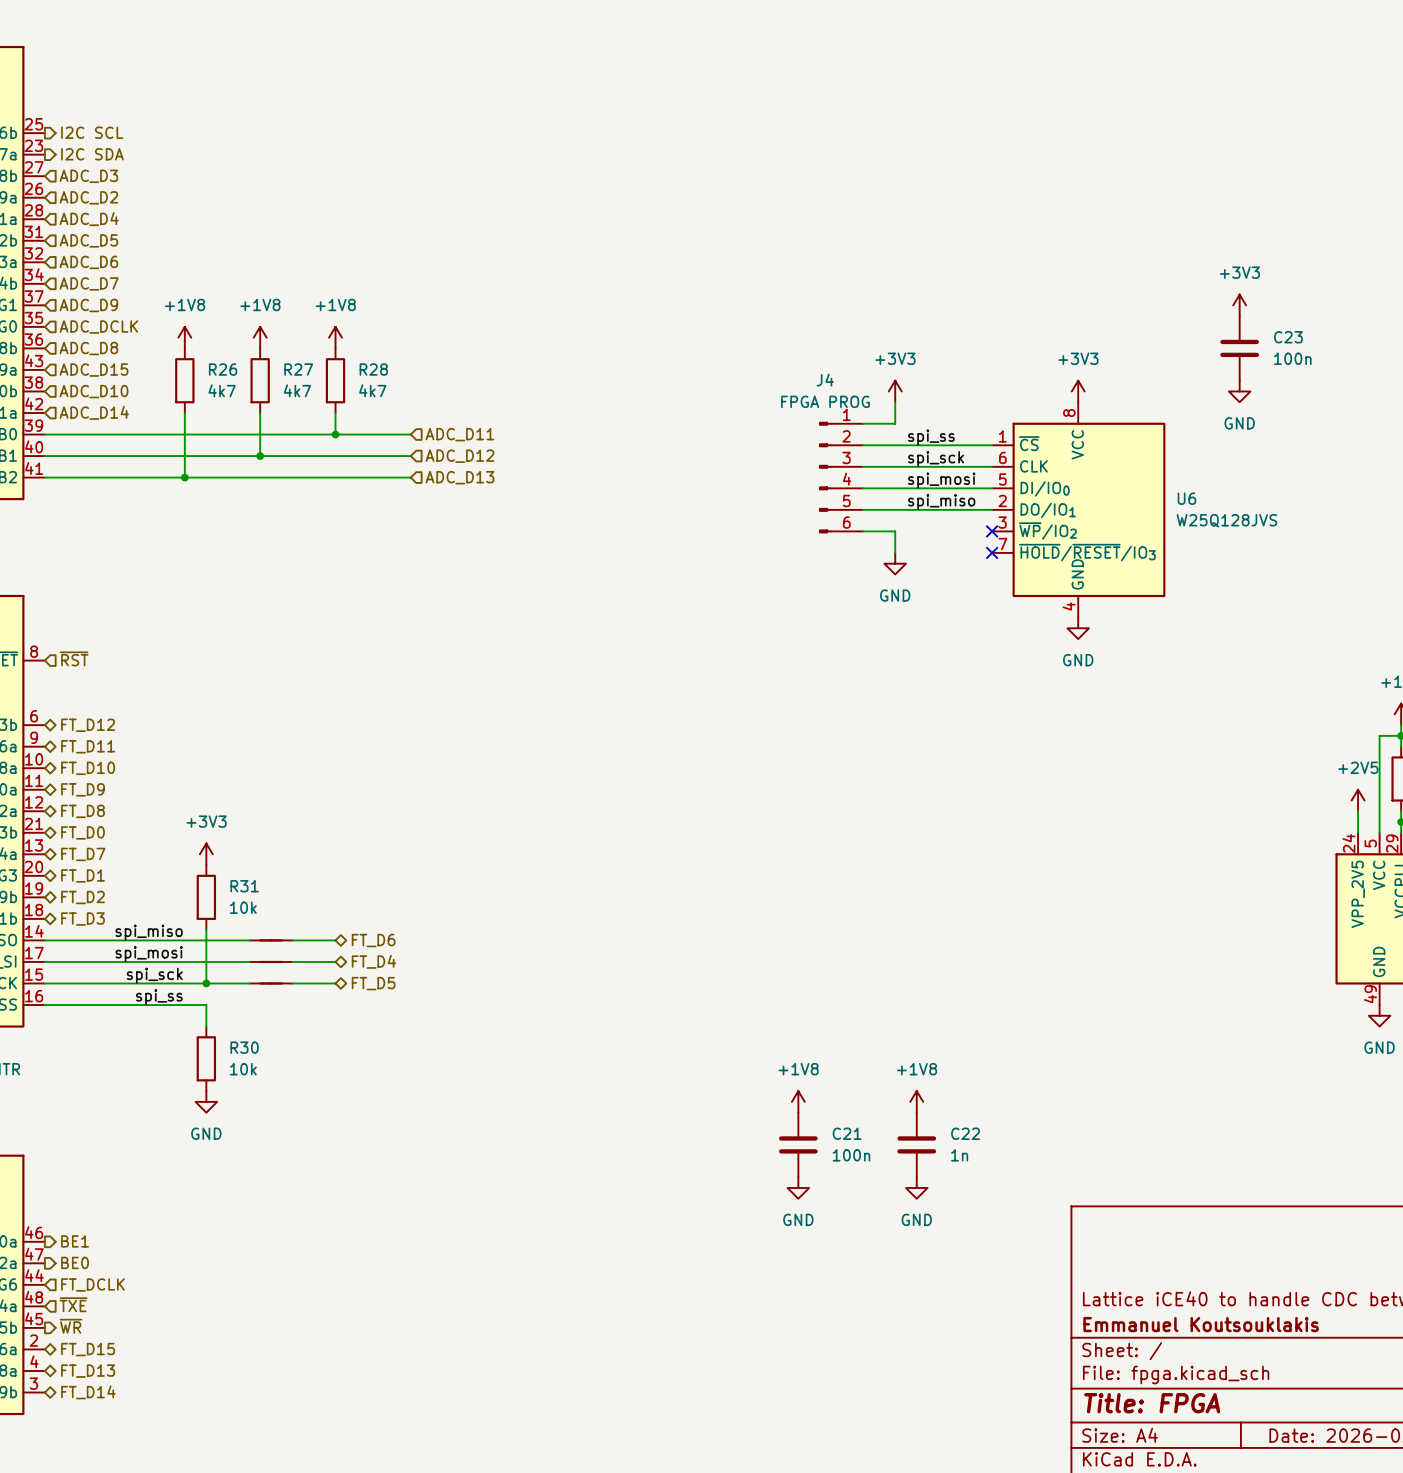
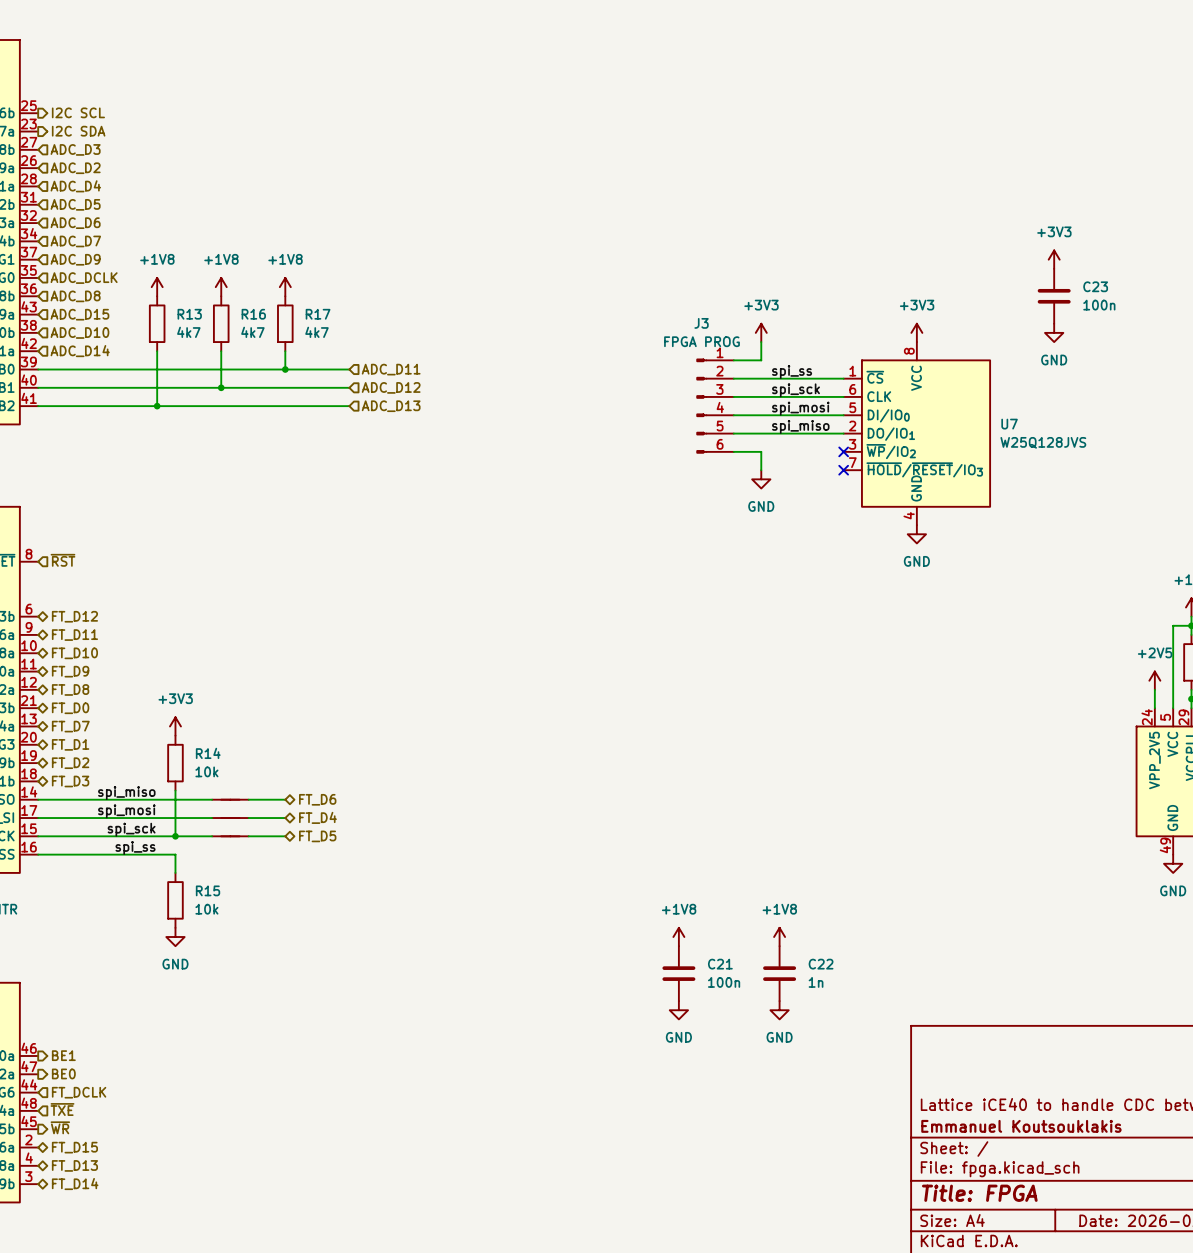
R26 name: R26 (223, 369) -> R13 (189, 314)
R27 name: R27 (298, 369) -> R16 (253, 314)
R28 name: R28 (373, 369) -> R17 (318, 314)
J4 name: J4 (825, 380) -> J3 (701, 323)
U6 name: U6 (1186, 498) -> U7 (1009, 424)
R31 name: R31 (244, 886) -> R14 (208, 753)
R30 name: R30 (244, 1047) -> R15 (208, 890)

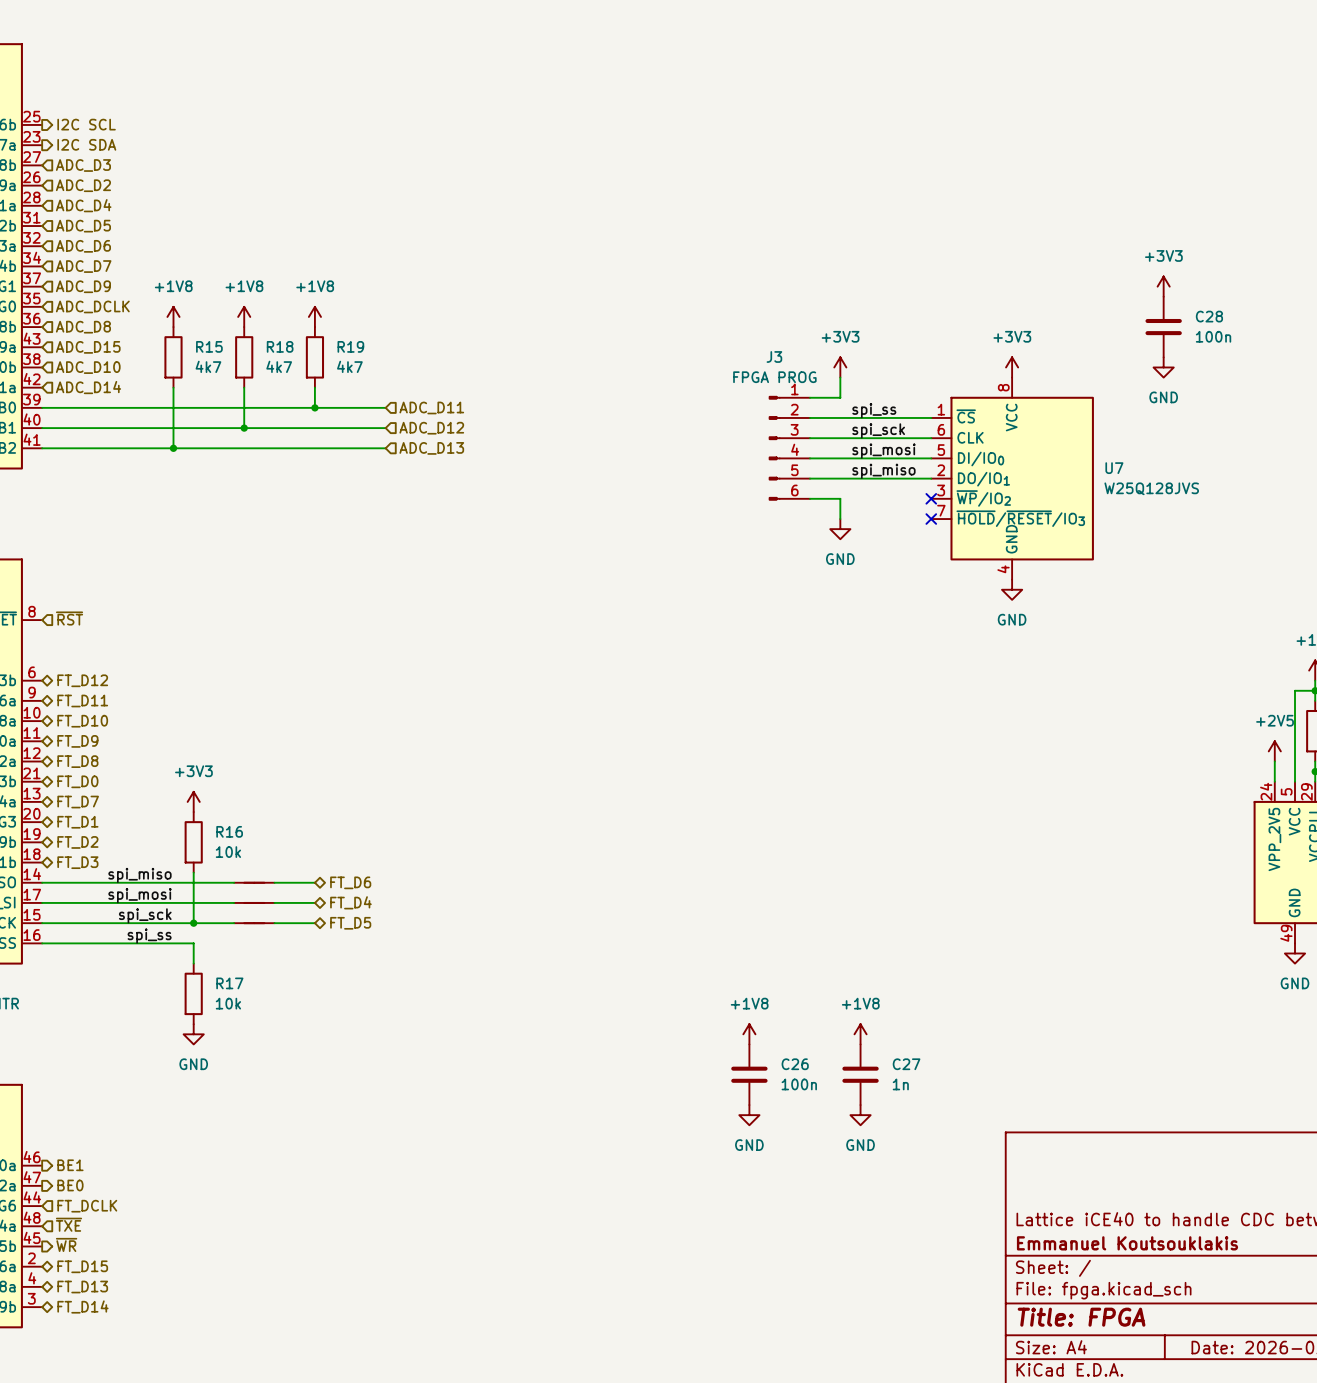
C23 name: C23 (1095, 286) -> C28 (1209, 316)
R13 name: R13 (189, 314) -> R15 (209, 346)
R16 name: R16 (253, 314) -> R18 (280, 346)
R17 name: R17 (318, 314) -> R19 (350, 346)
R14 name: R14 (208, 753) -> R16 (229, 831)
R15 name: R15 (208, 890) -> R17 (229, 983)
C21 name: C21 (720, 964) -> C26 (795, 1064)
C22 name: C22 (821, 964) -> C27 (906, 1064)

